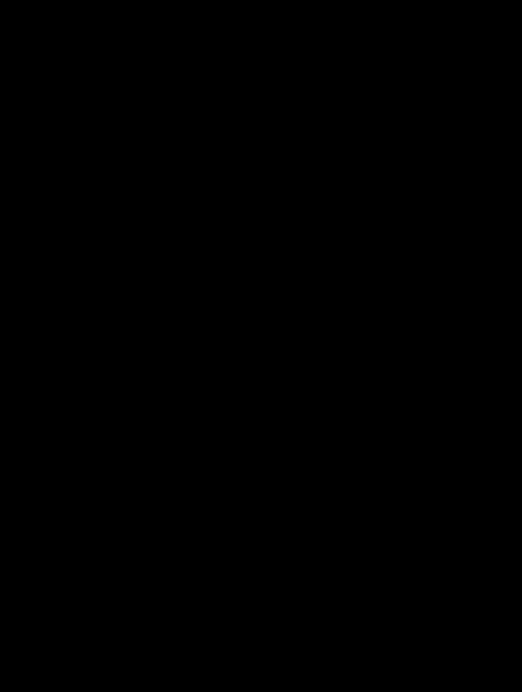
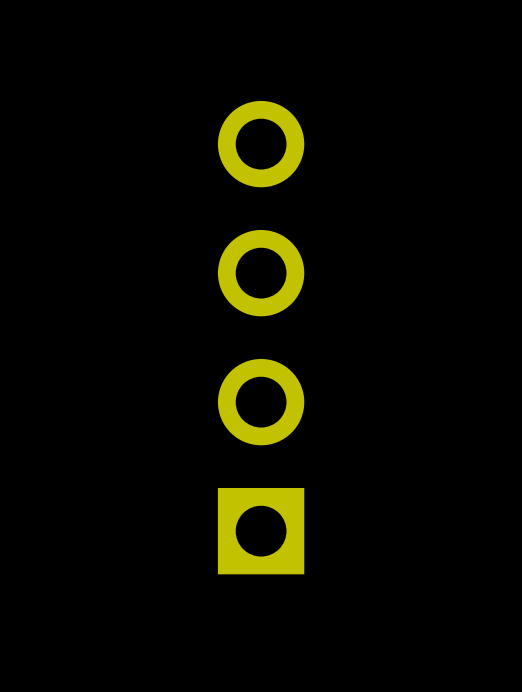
part: none -> (261, 337)

